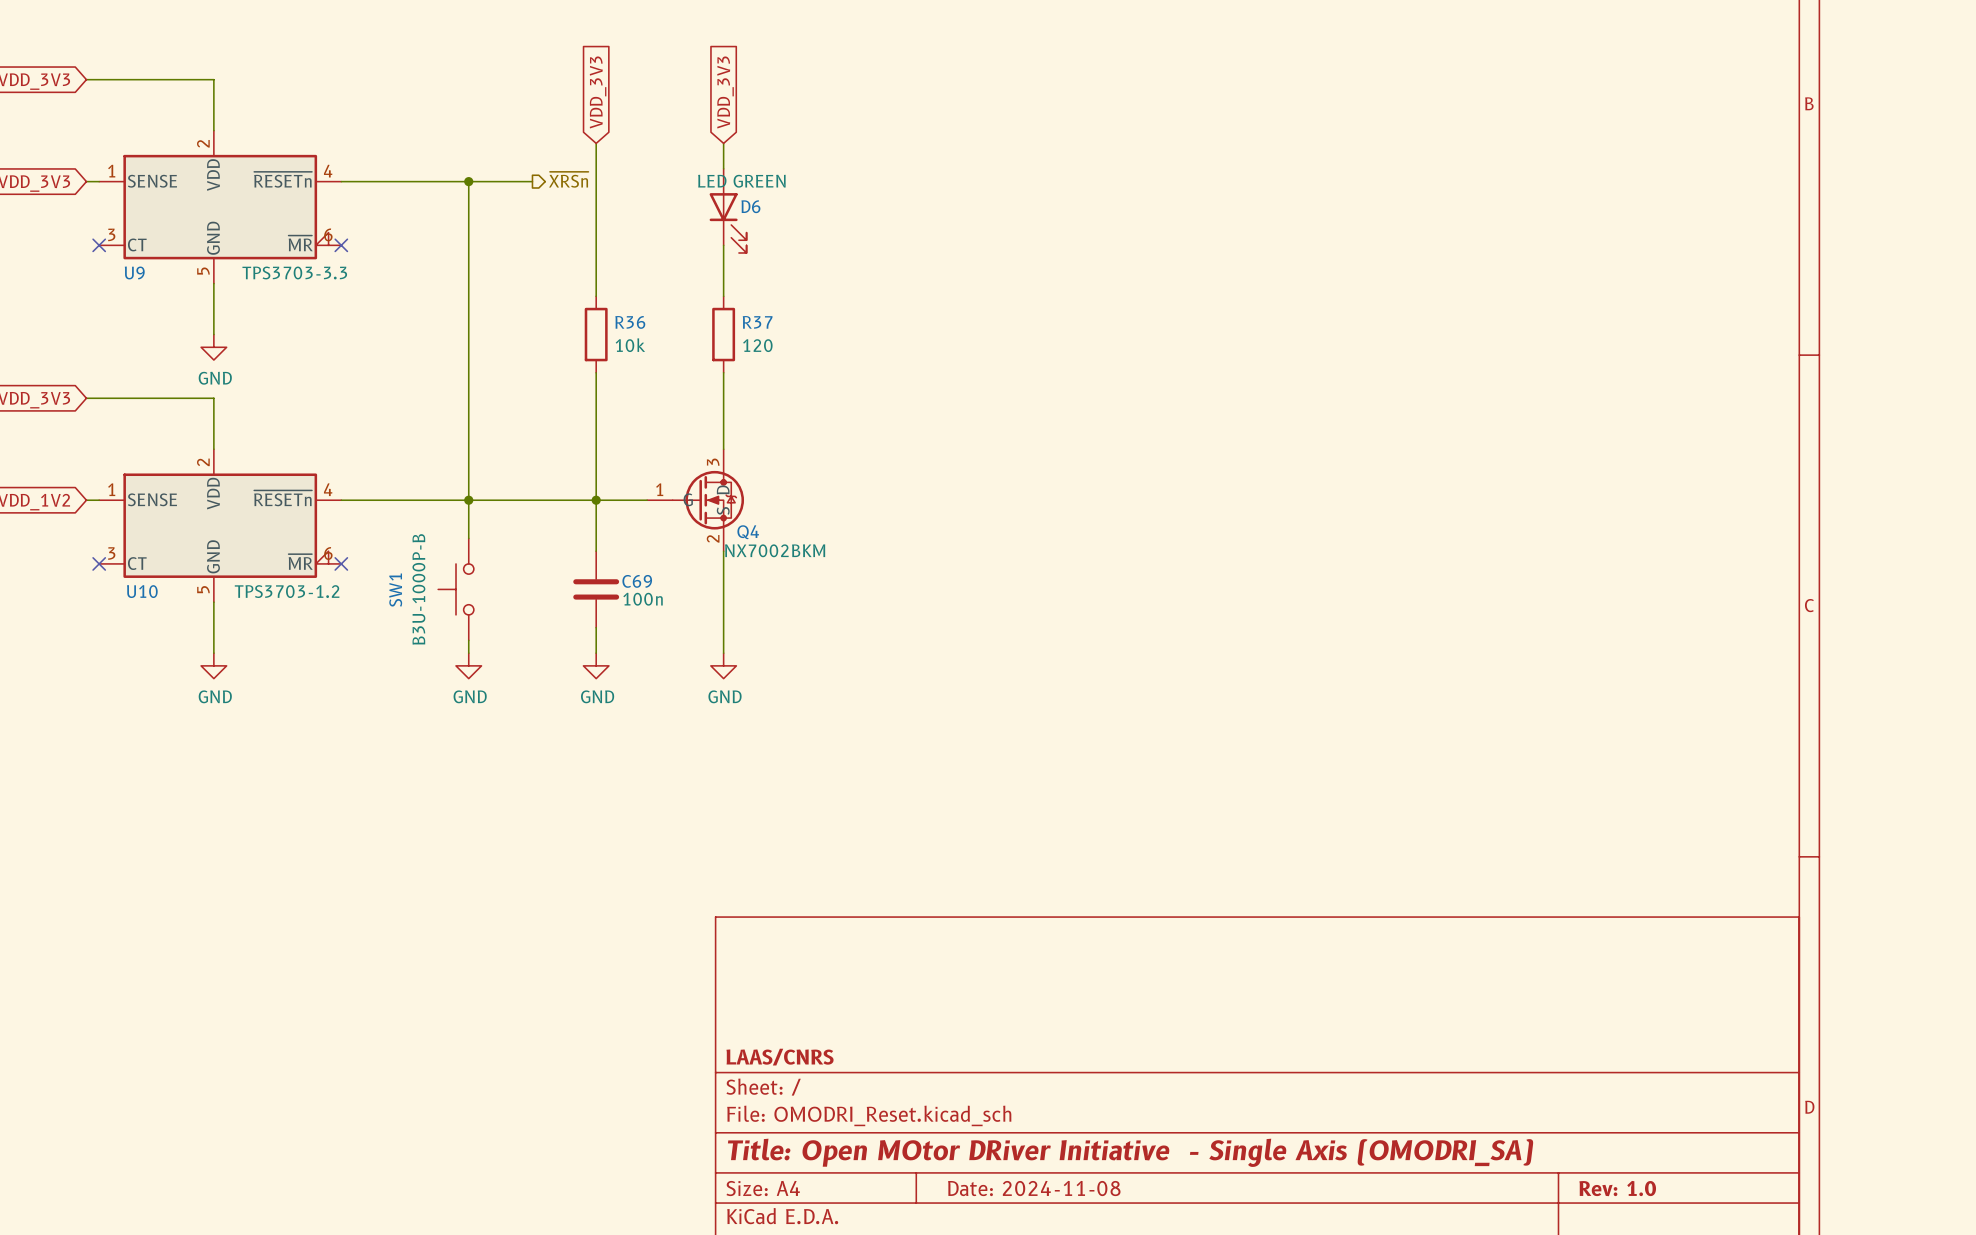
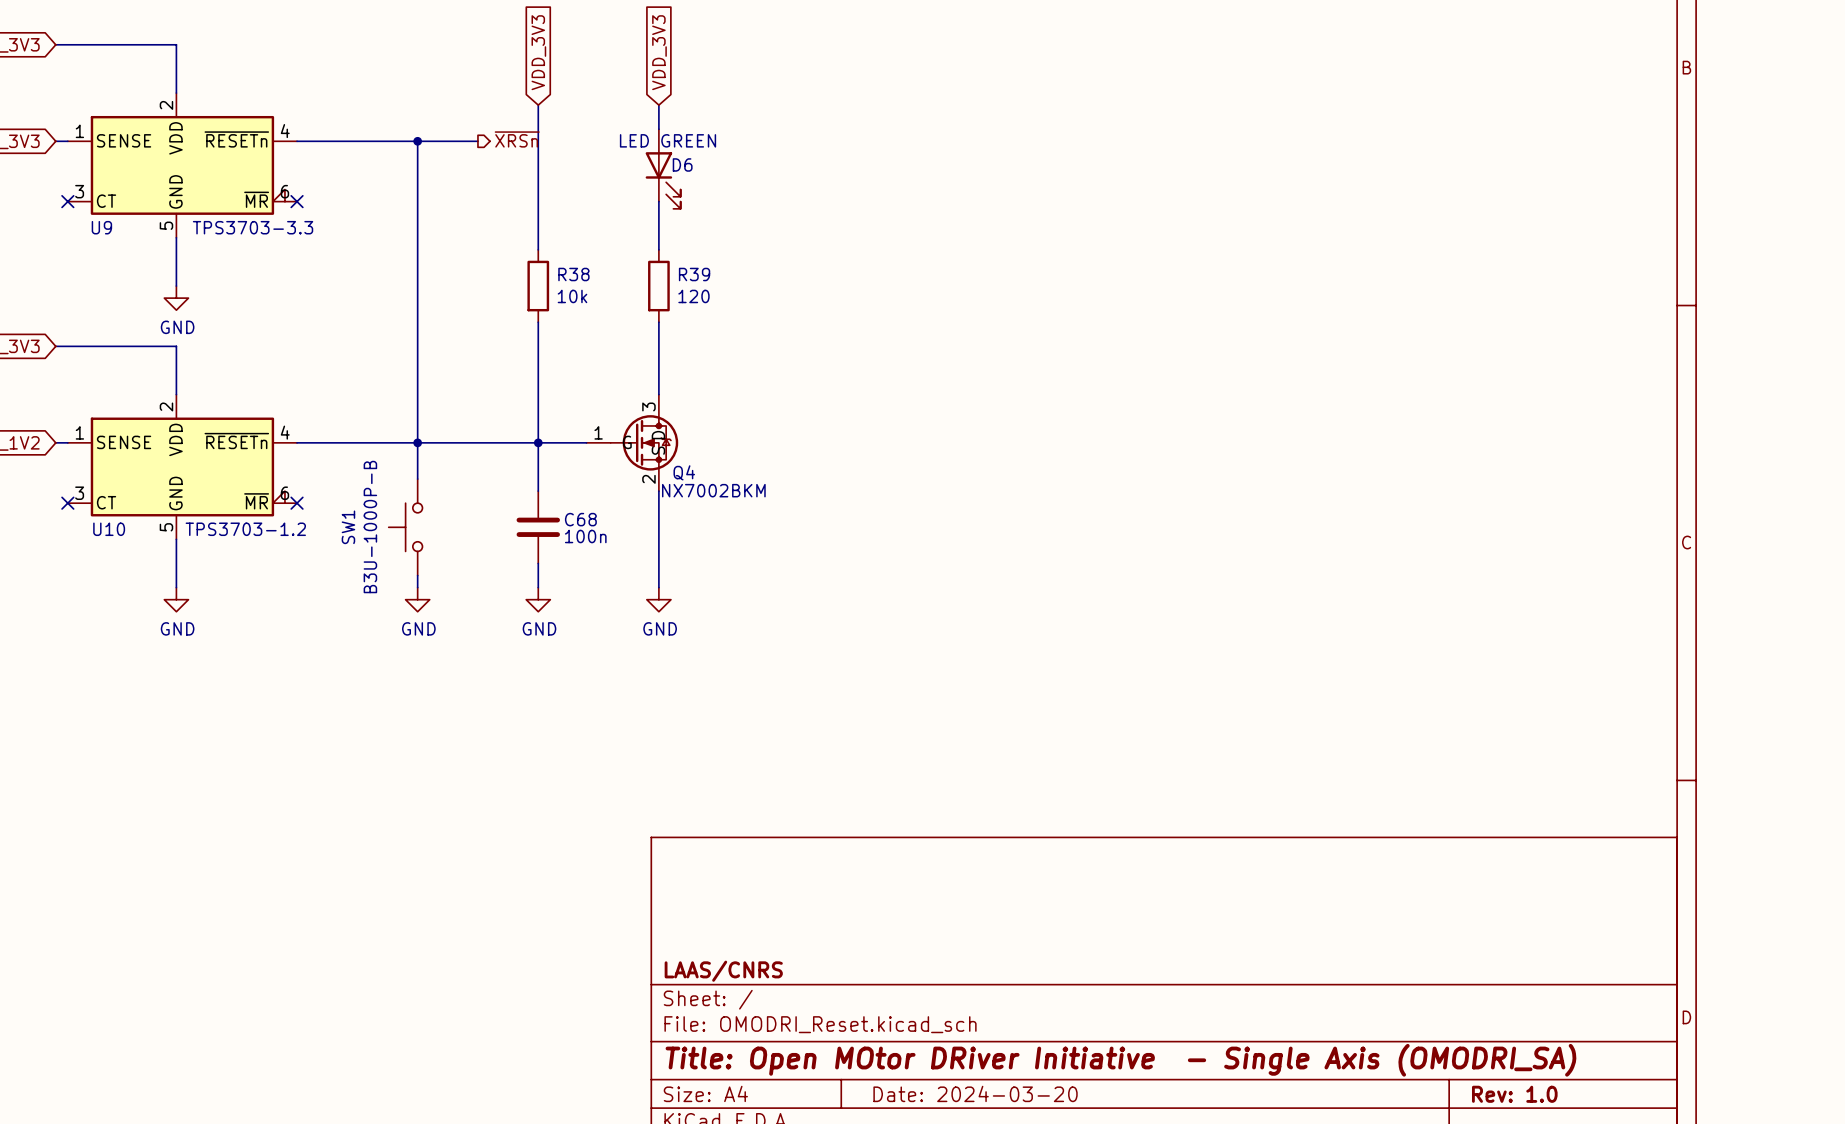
R36 name: R36 (630, 322) -> R38 (573, 274)
R37 name: R37 (757, 322) -> R39 (694, 274)
C69 name: C69 (637, 581) -> C68 (580, 519)
title block: Date: 2024-11-08 (1034, 1188) -> Date: 2024-03-20 (975, 1093)

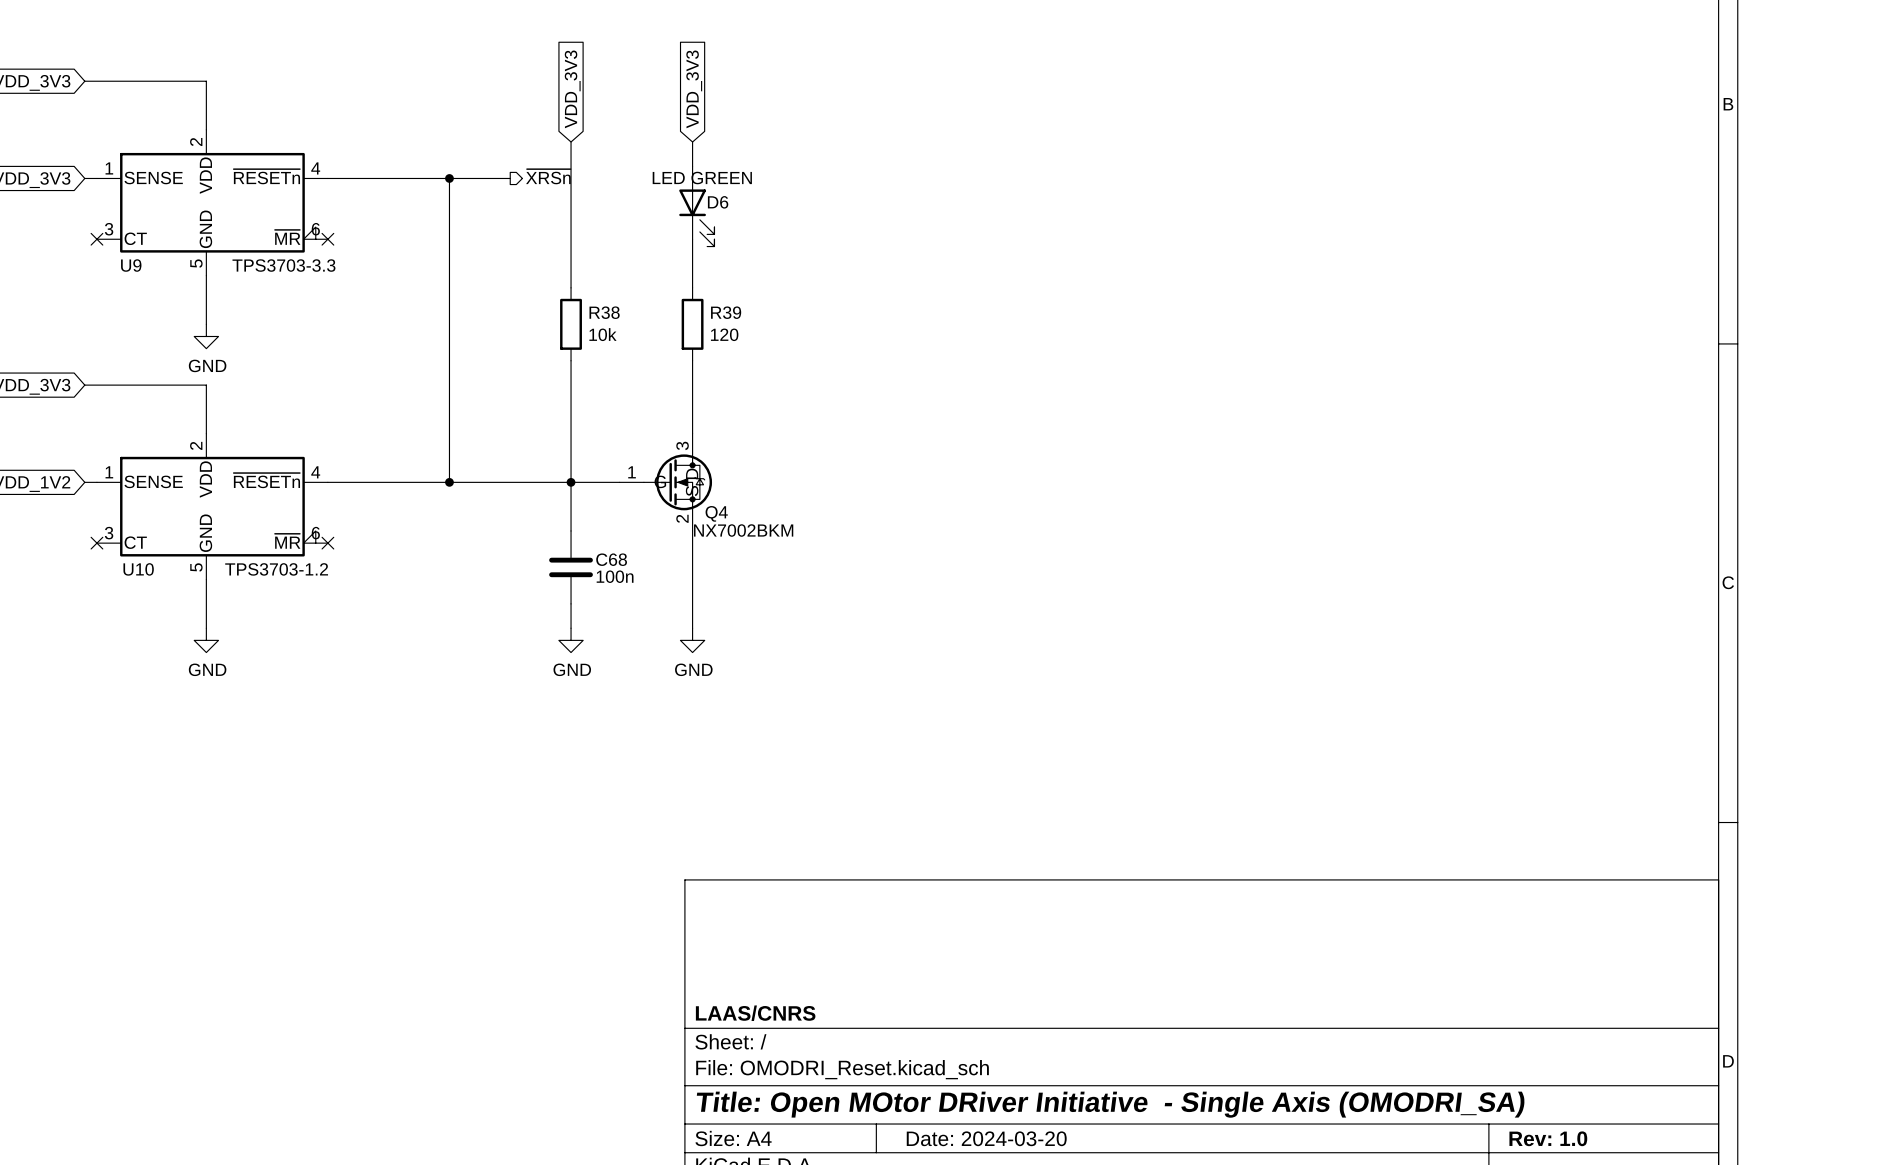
wire: (417, 442) (417, 479) -> none
SW1: B3U-1000P-B (405, 527) -> none
wire: (417, 575) (417, 587) -> none
power symbol: GND (417, 599) -> none

